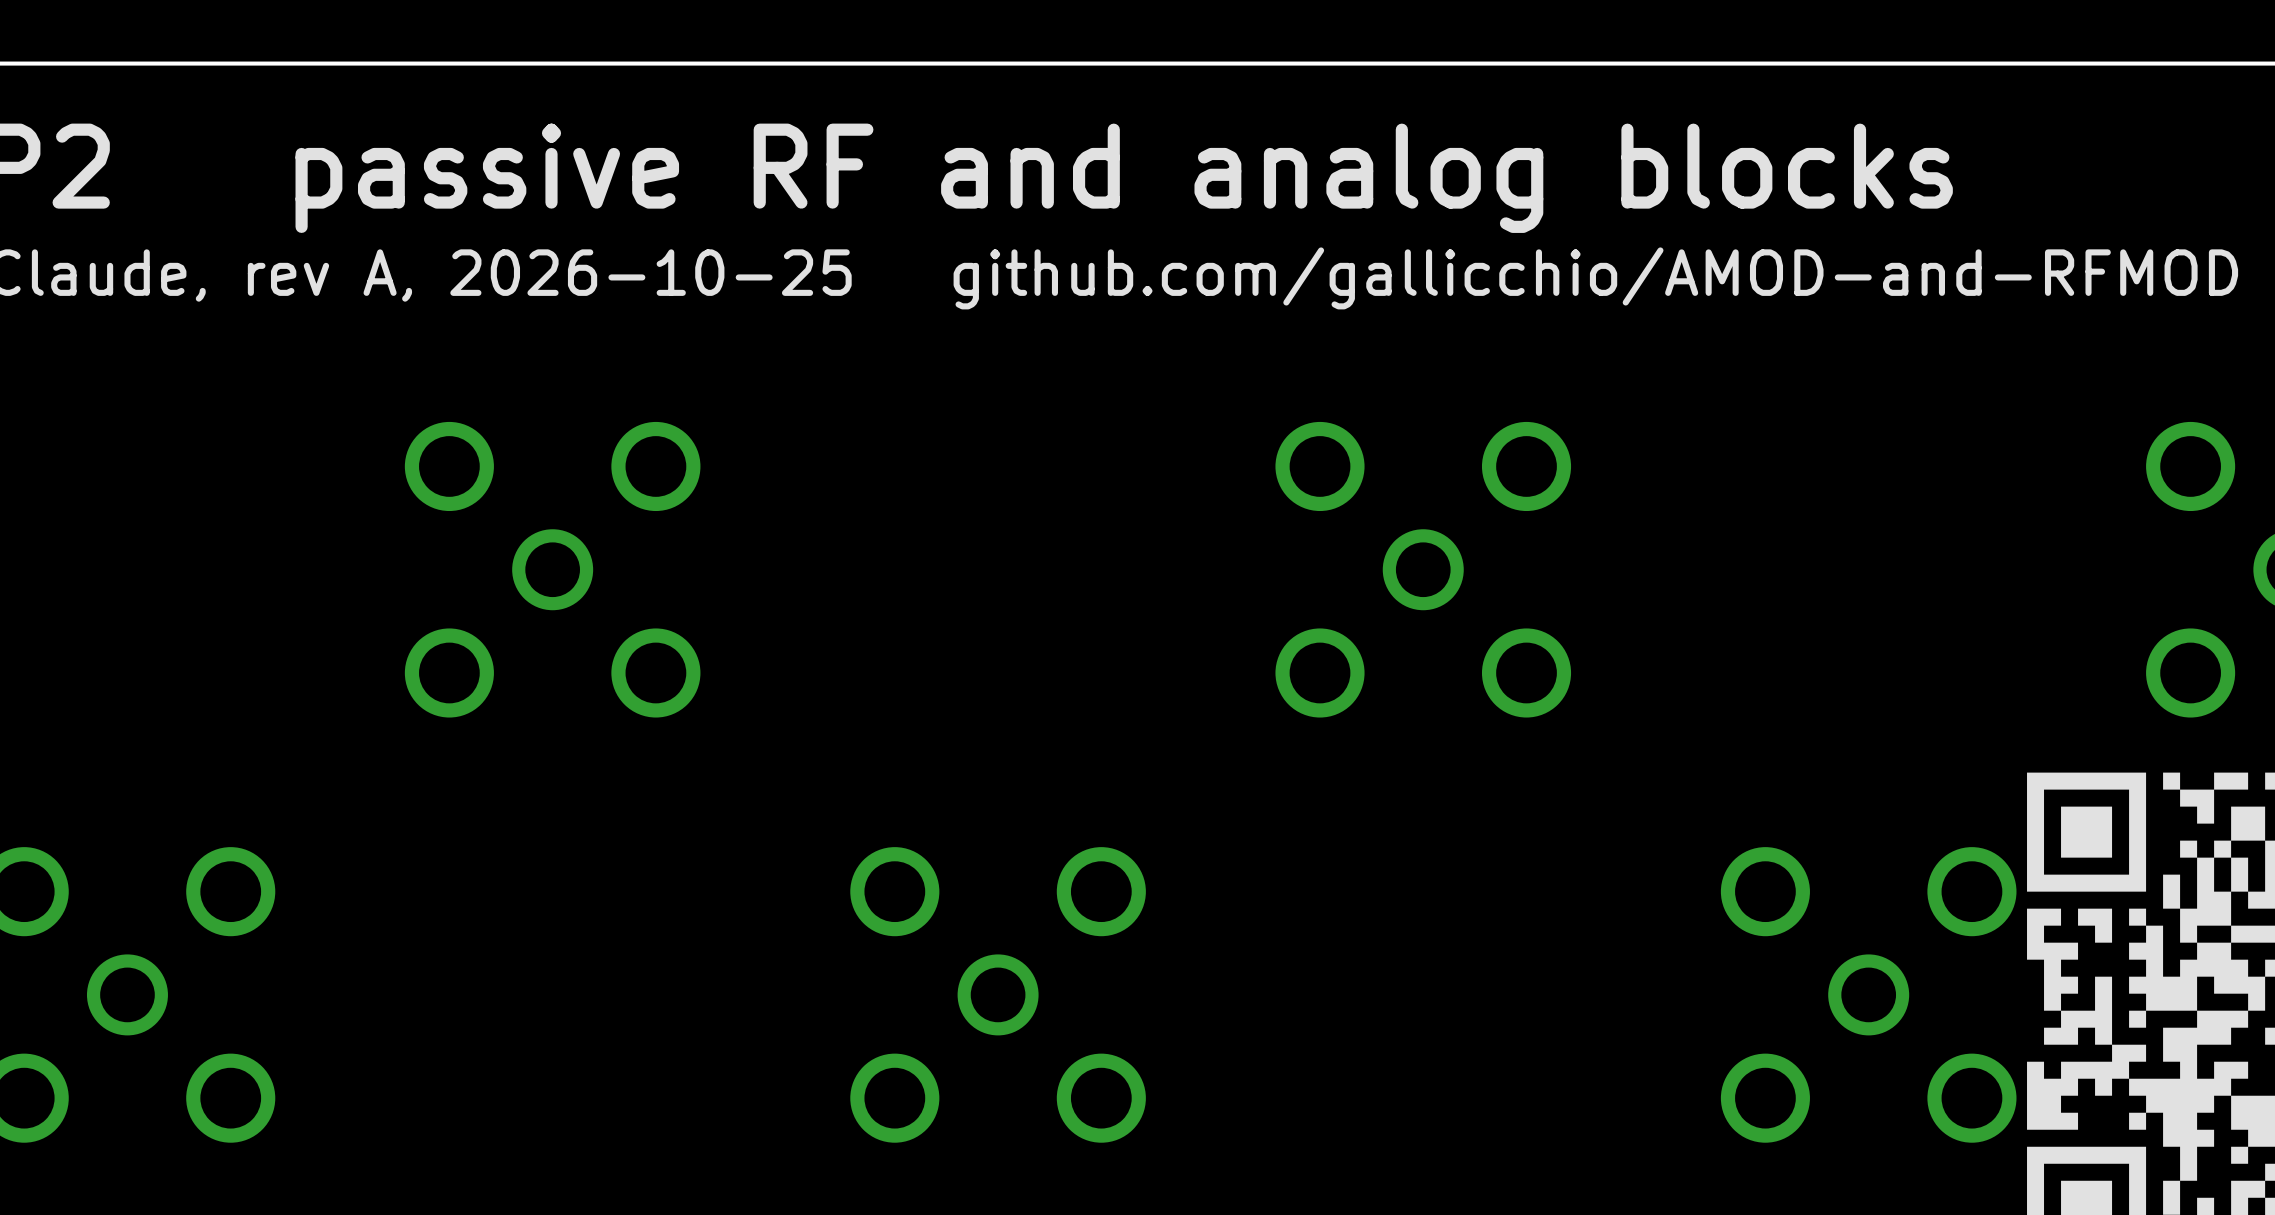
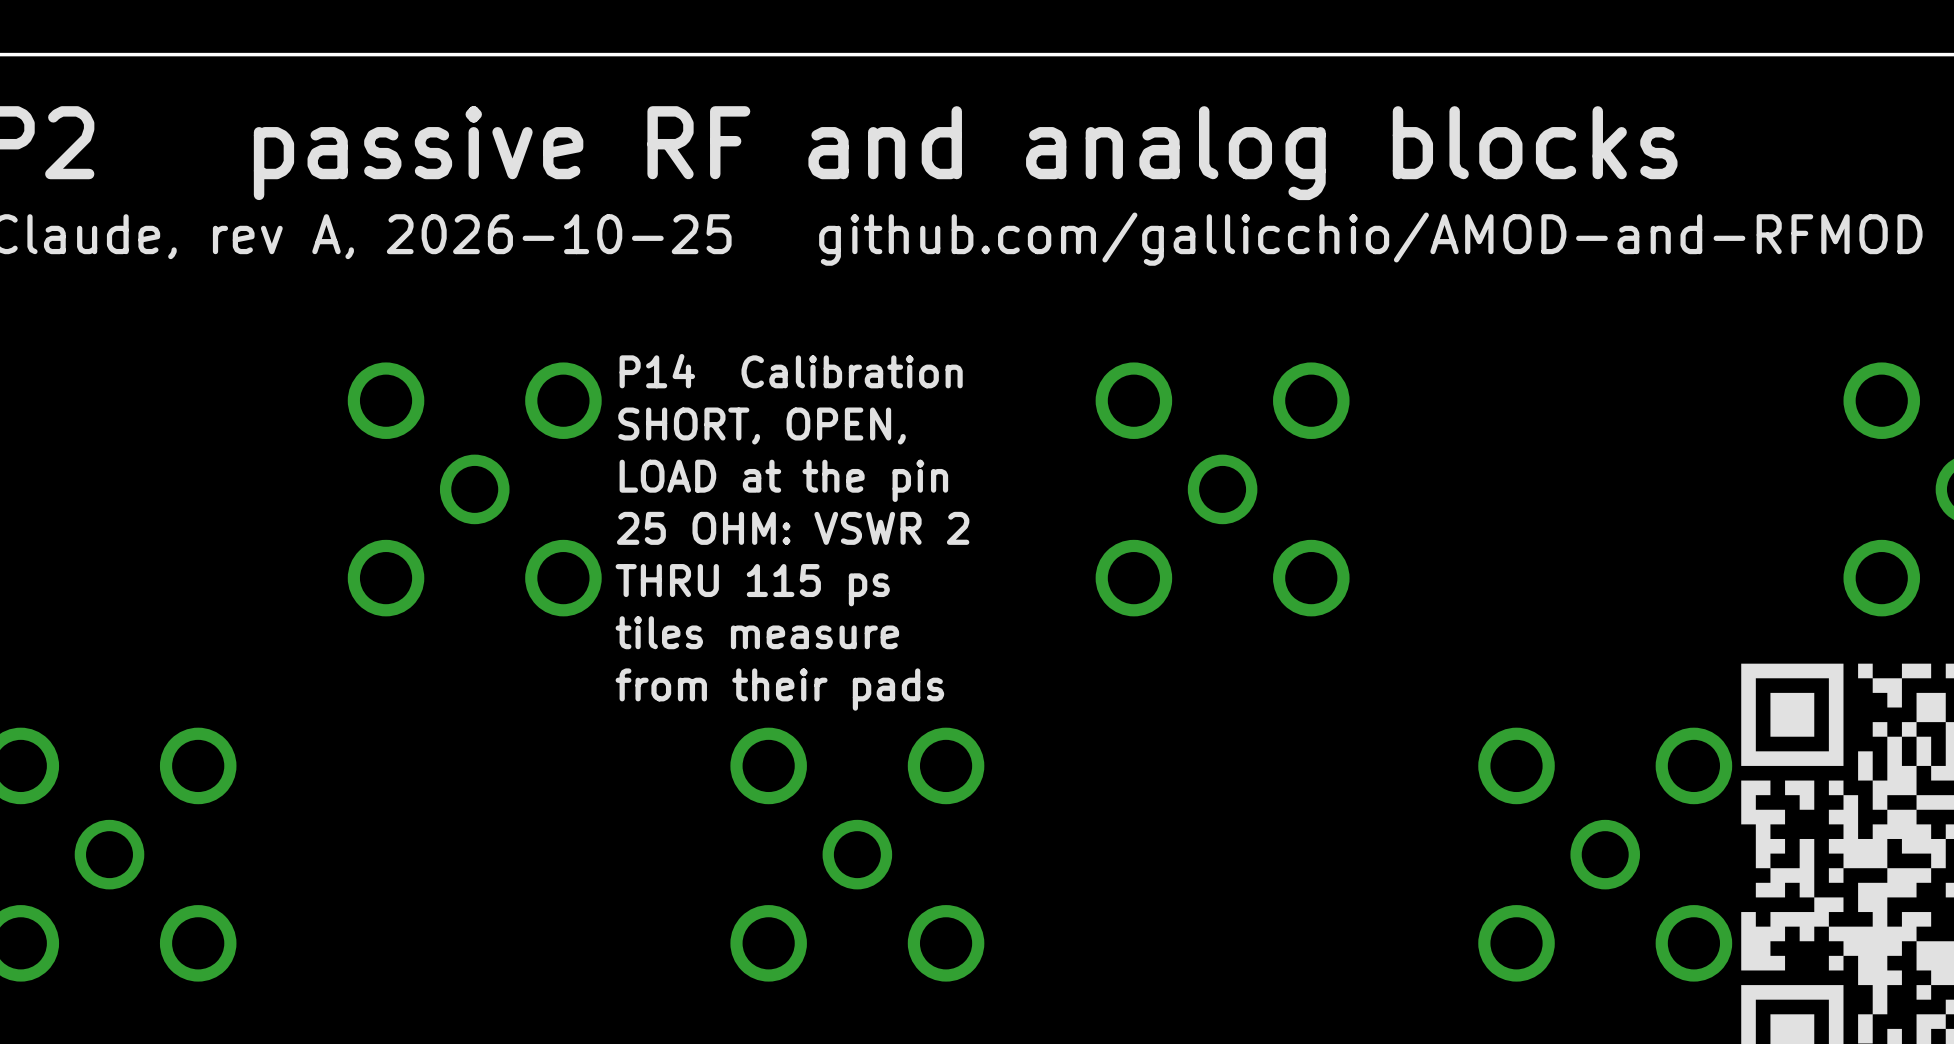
text: none -> P14 Calibration (791, 371)
text: none -> SHORT, OPEN, (761, 426)
text: none -> LOAD at the pin (783, 480)
text: none -> 25 OHM: VSWR 2 (793, 528)
text: none -> THRU 115 ps (752, 585)
text: none -> tiles measure (757, 632)
text: none -> from their pads (779, 689)

